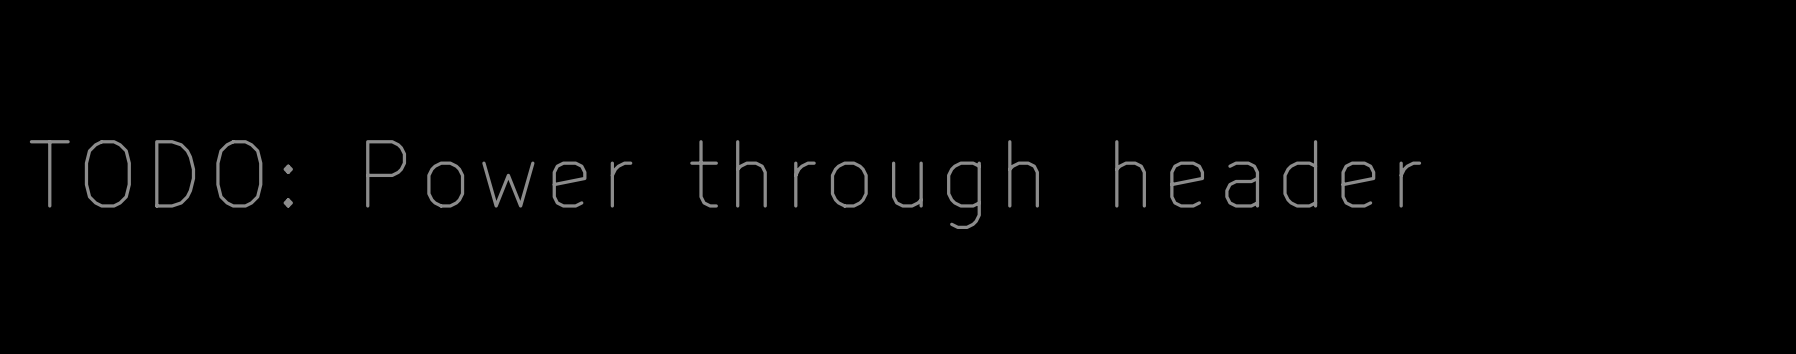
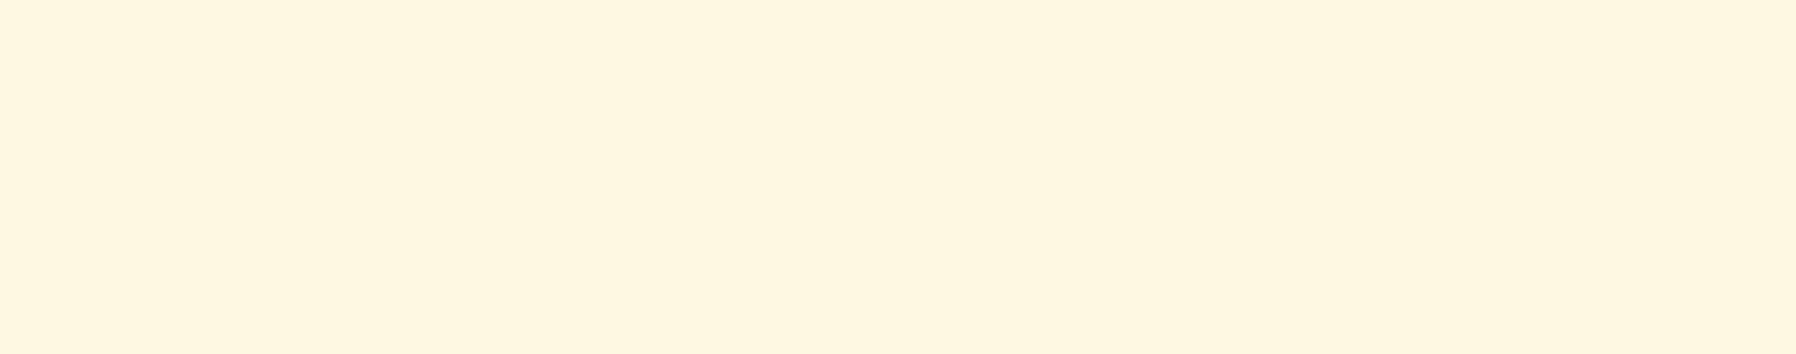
text: TODO: Power through header (725, 184) -> none

